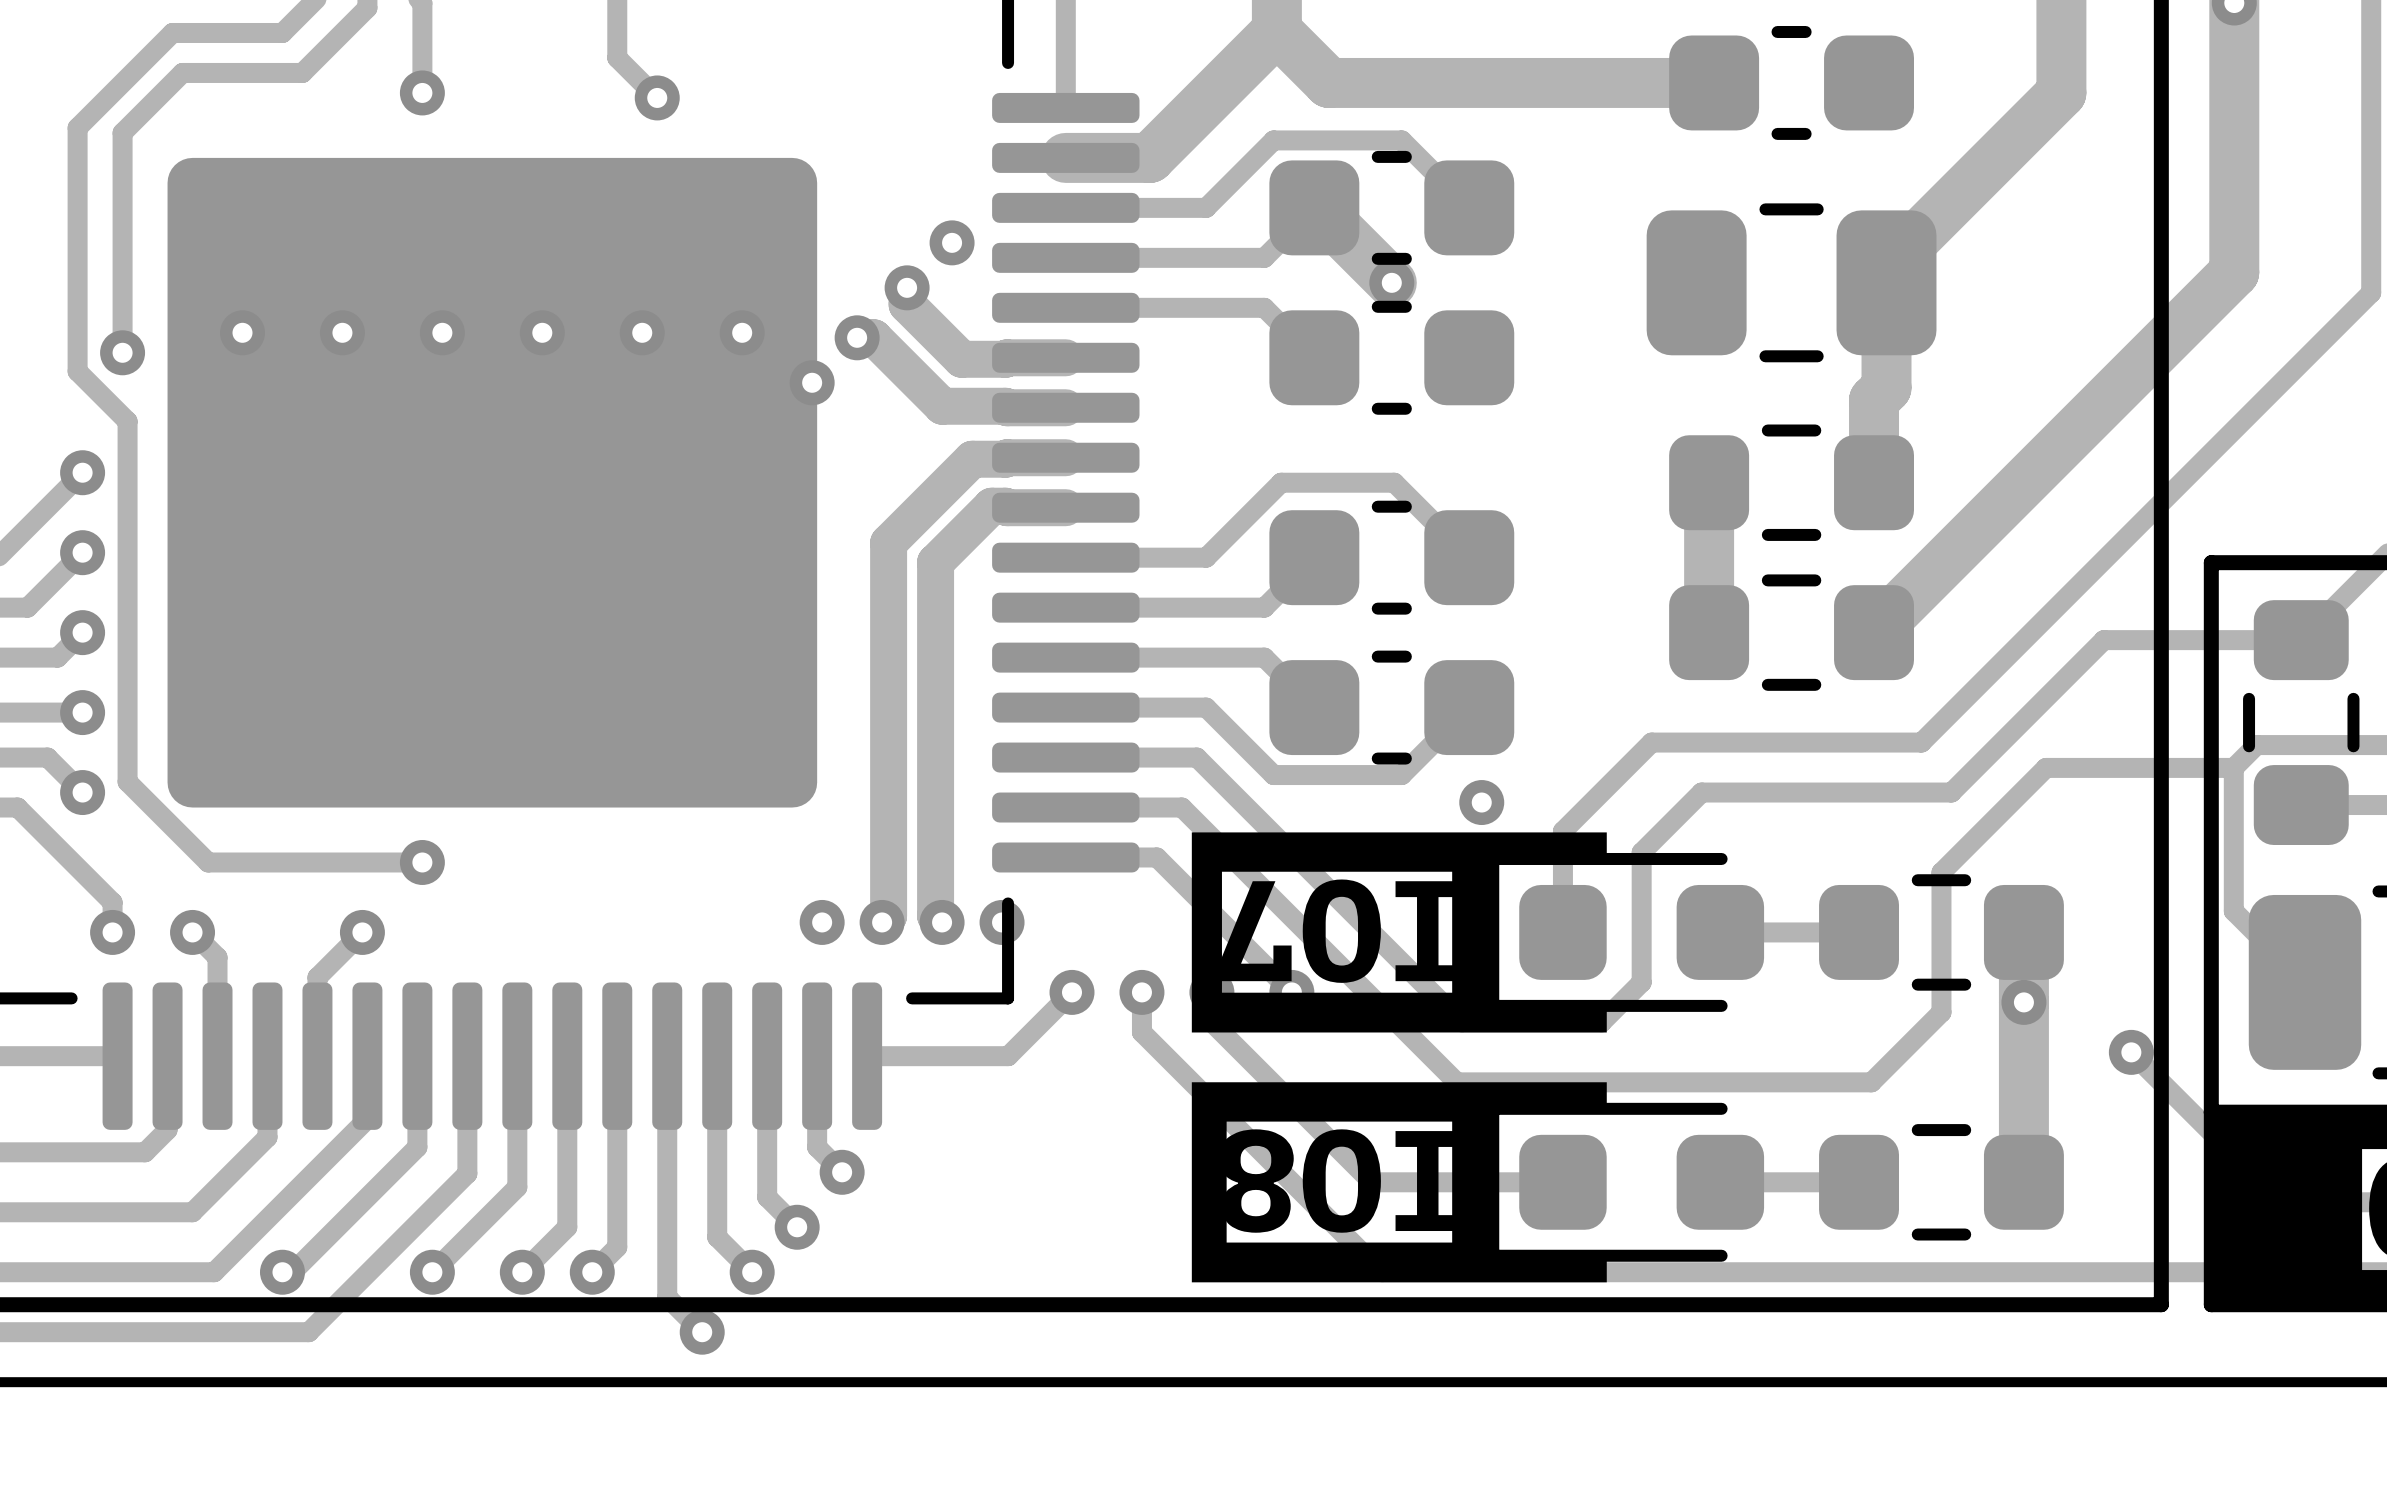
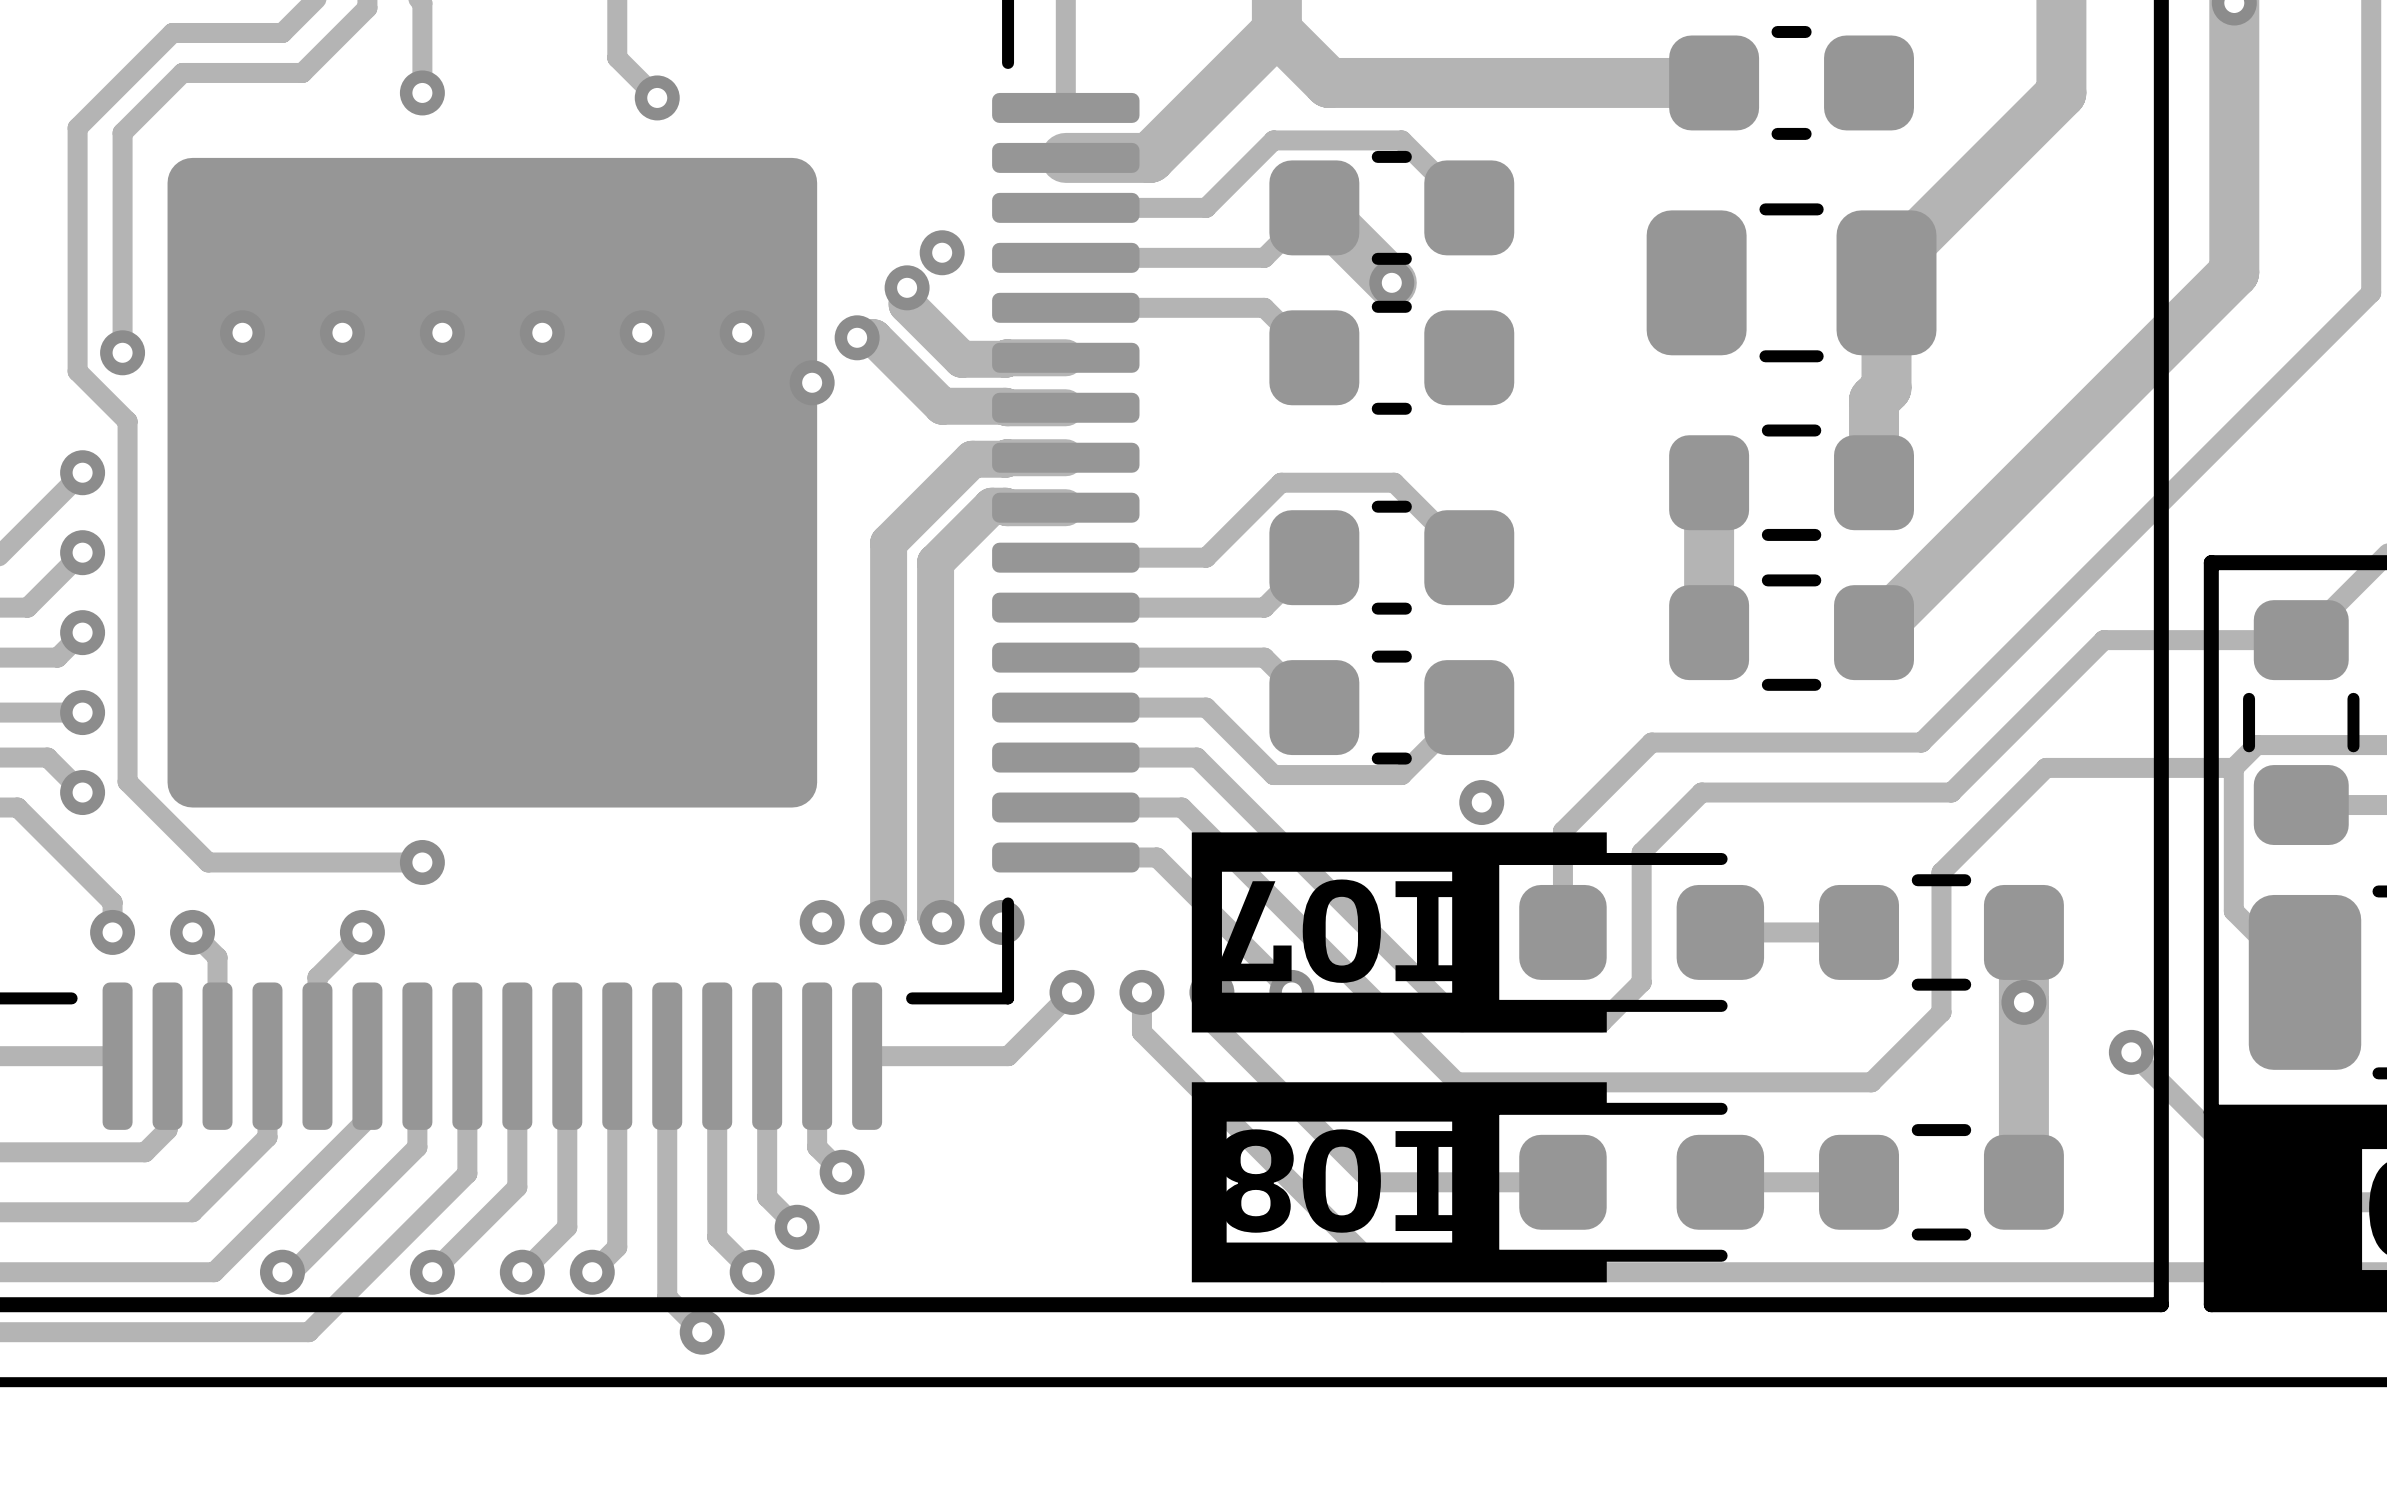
via position: (952, 242) -> (942, 252)

